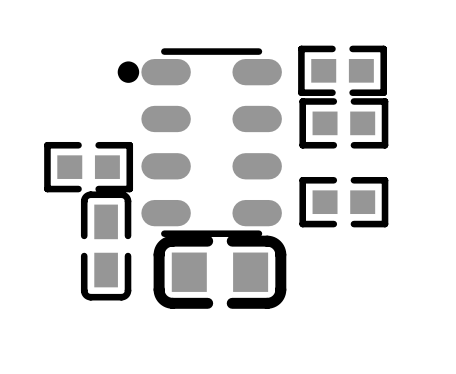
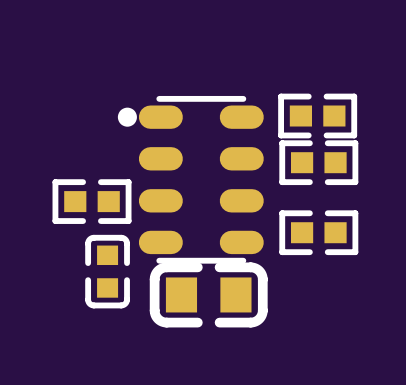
part footprint: [80, 191, 132, 301] -> [85, 234, 130, 309]

